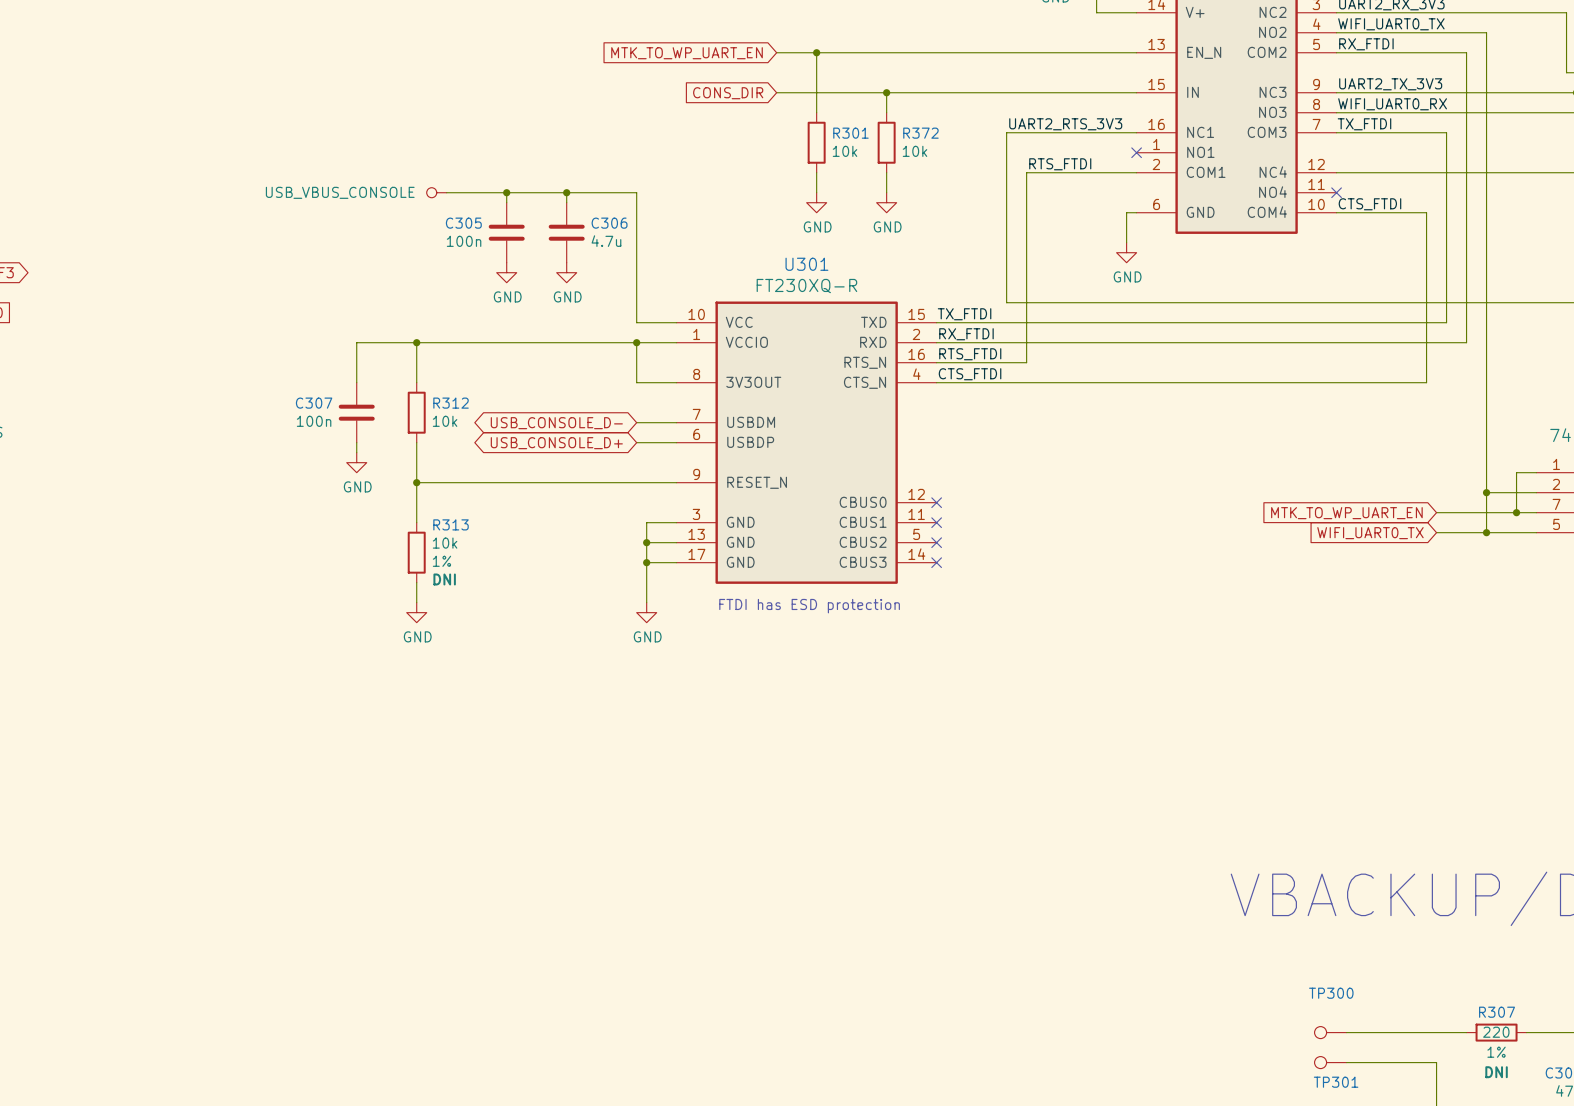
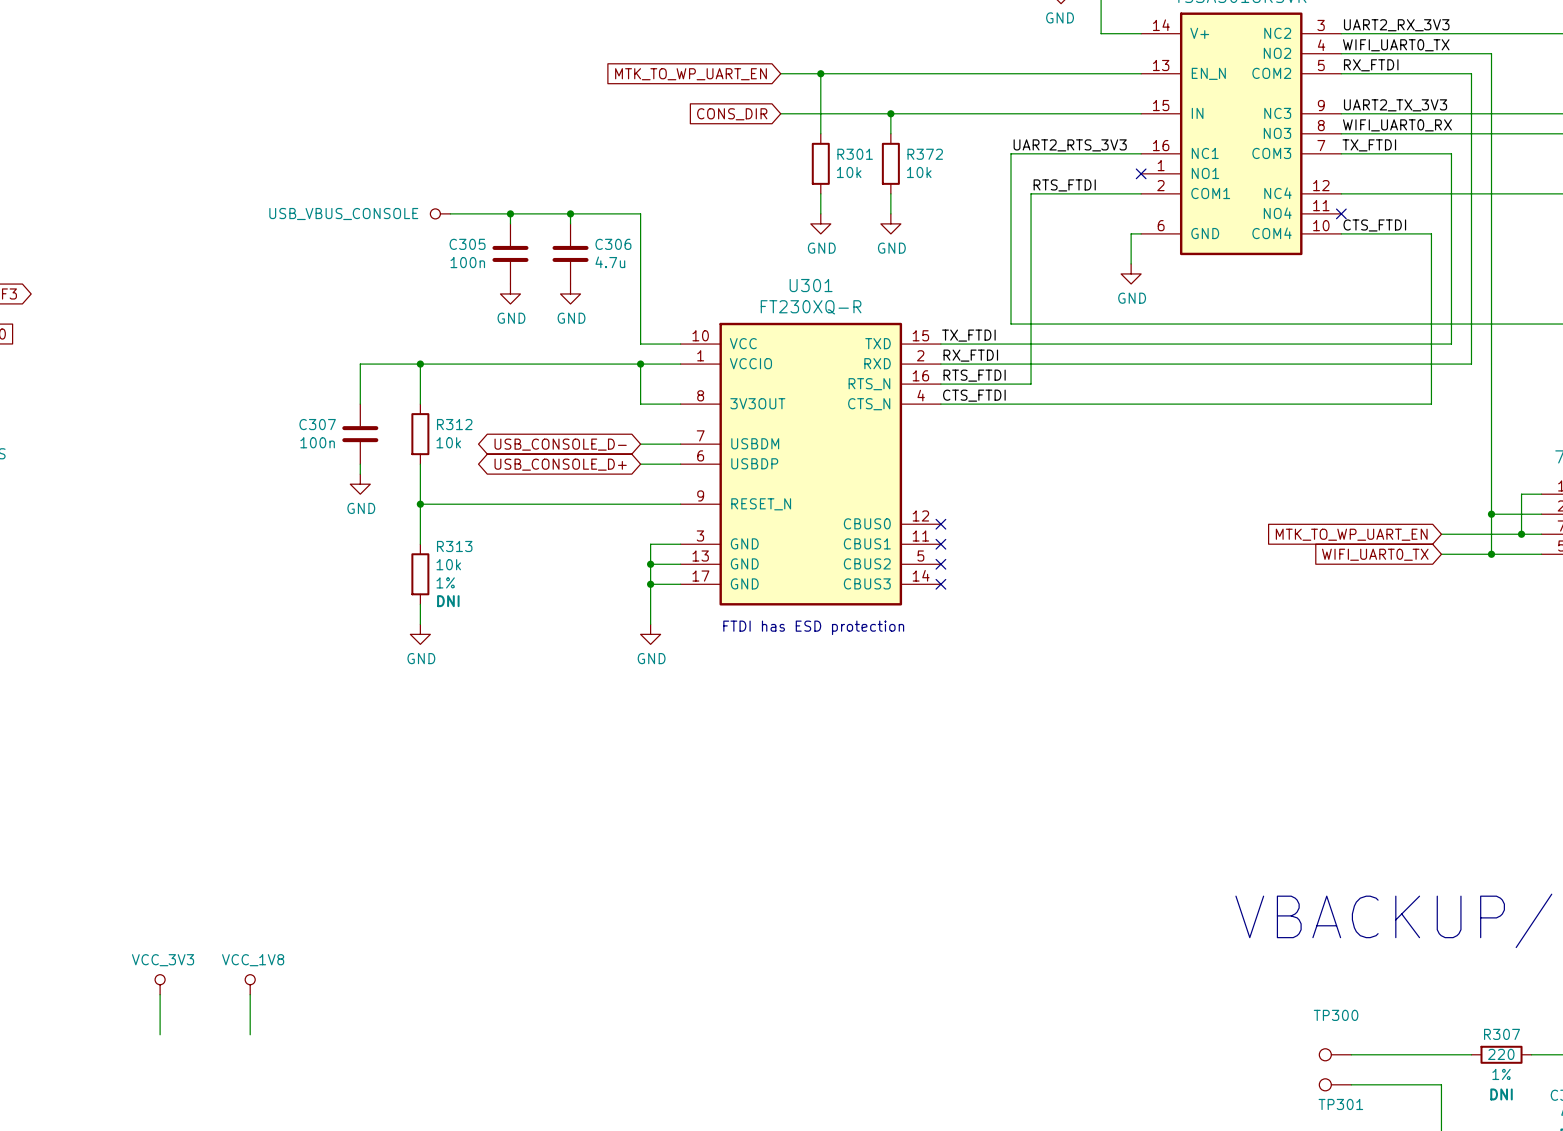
power symbol: none -> VCC_3V3 (160, 984)
power symbol: none -> VCC_1V8 (250, 984)
wire: none -> (160, 994) (160, 1034)
wire: none -> (250, 994) (250, 1034)

